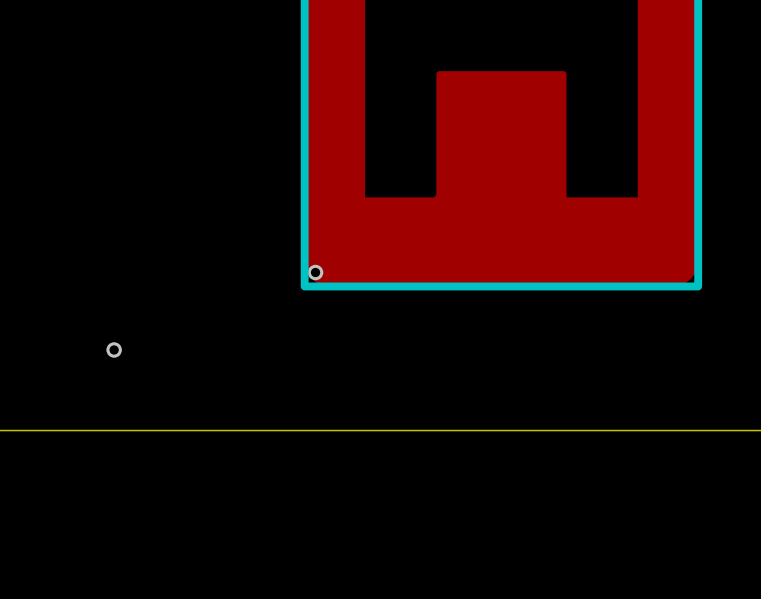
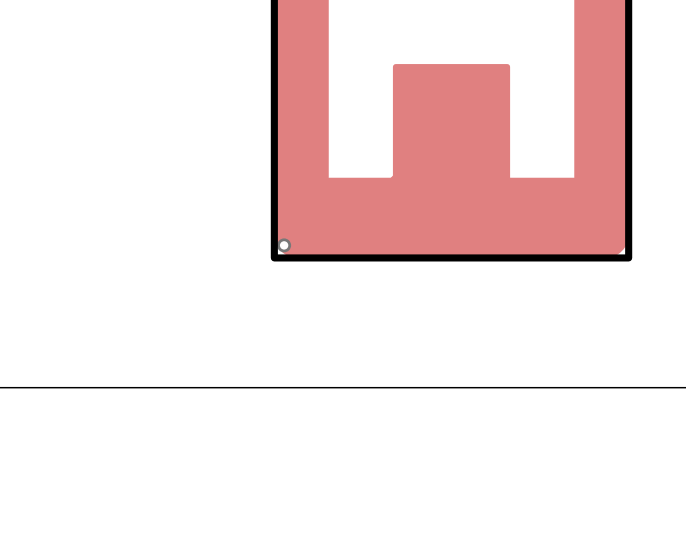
via: (114, 349) -> none

